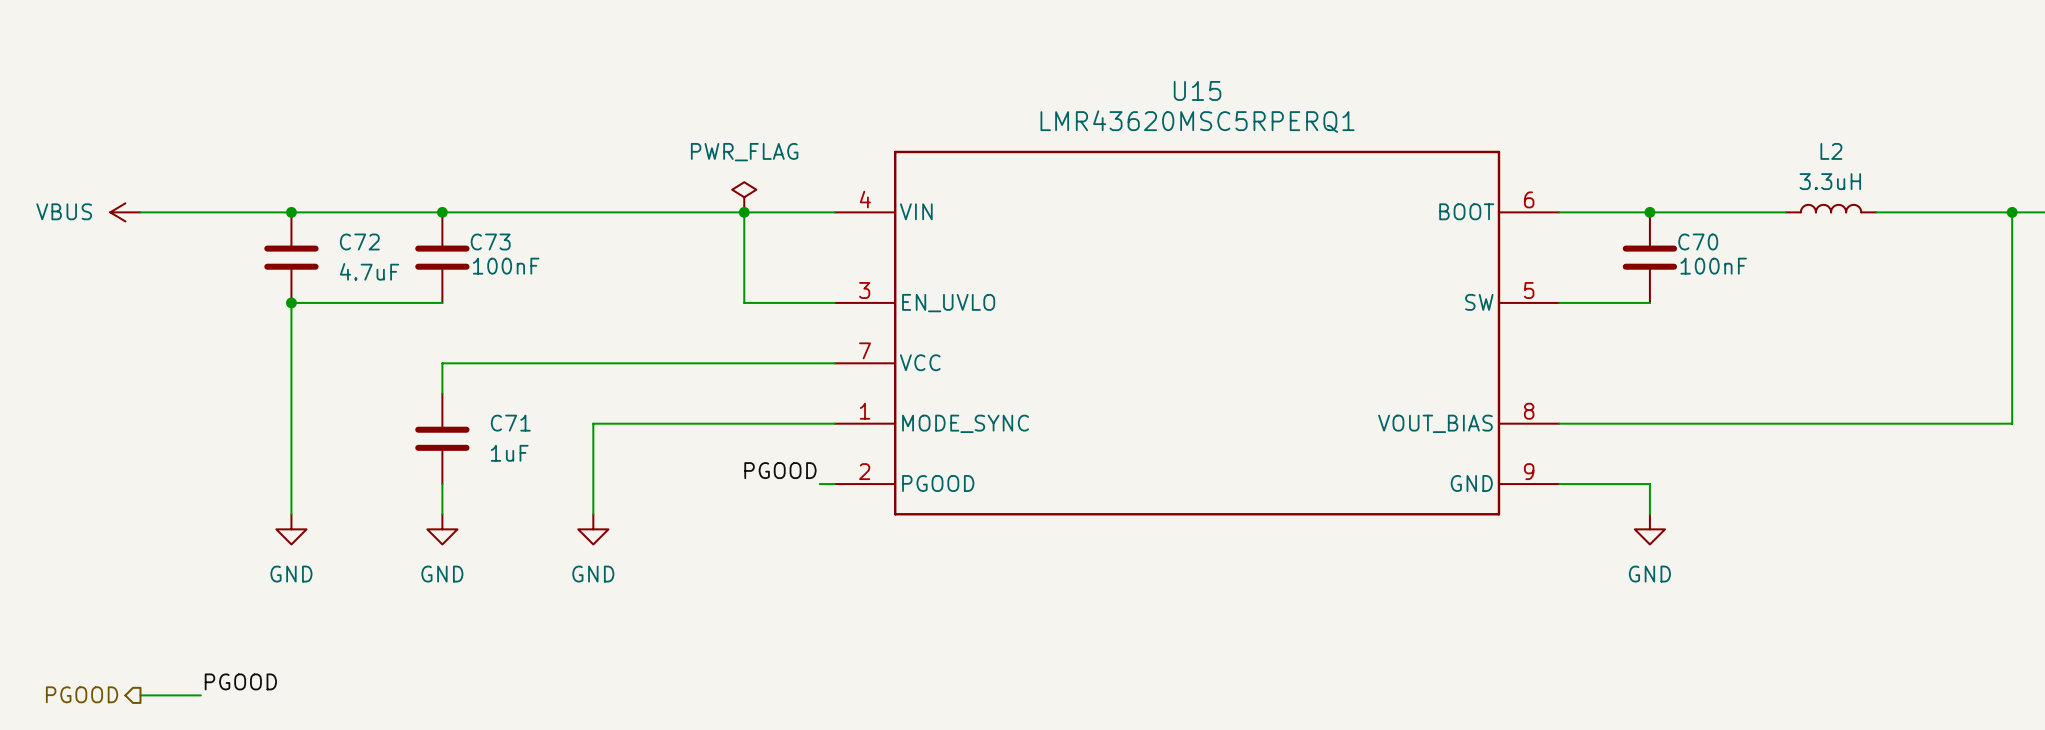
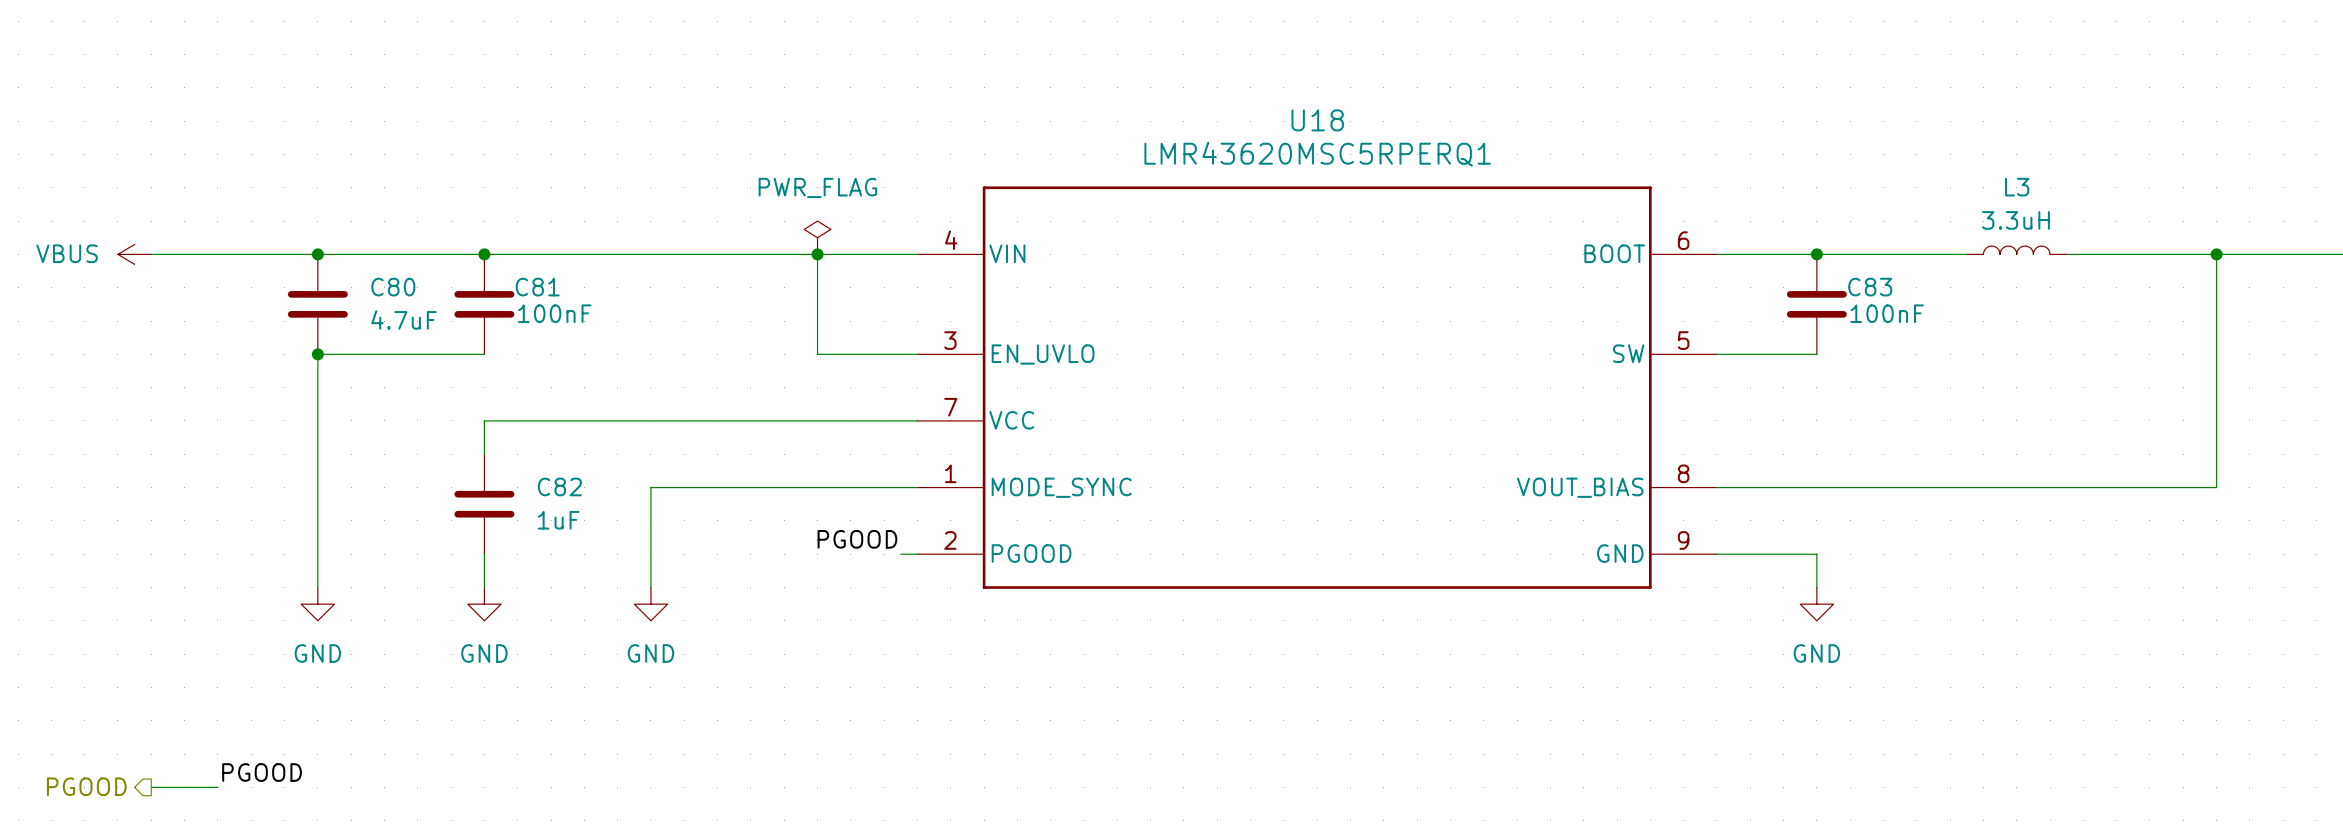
U15 name: U15 (1197, 90) -> U18 (1317, 120)
L2 name: L2 (1831, 151) -> L3 (2017, 187)
C72 name: C72 (359, 241) -> C80 (393, 287)
C73 name: C73 (490, 241) -> C81 (537, 287)
C70 name: C70 (1698, 241) -> C83 (1870, 287)
C71 name: C71 (510, 423) -> C82 (559, 486)

